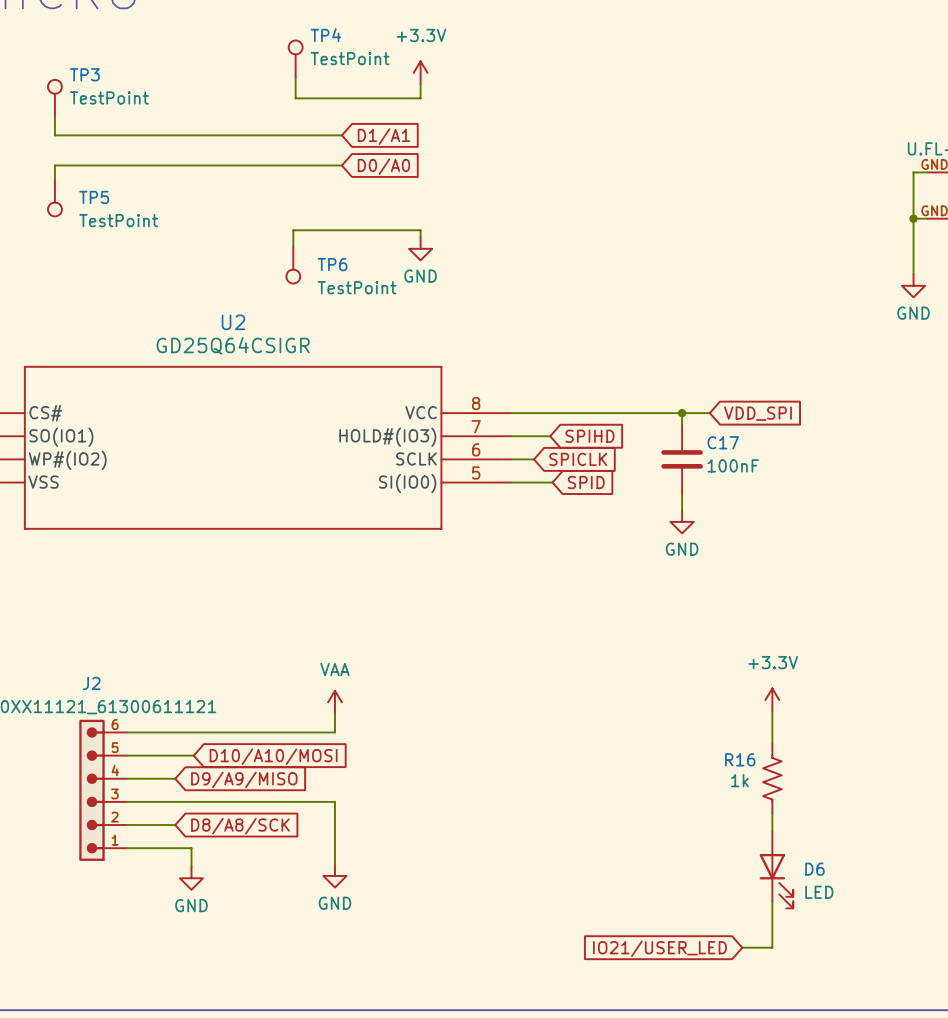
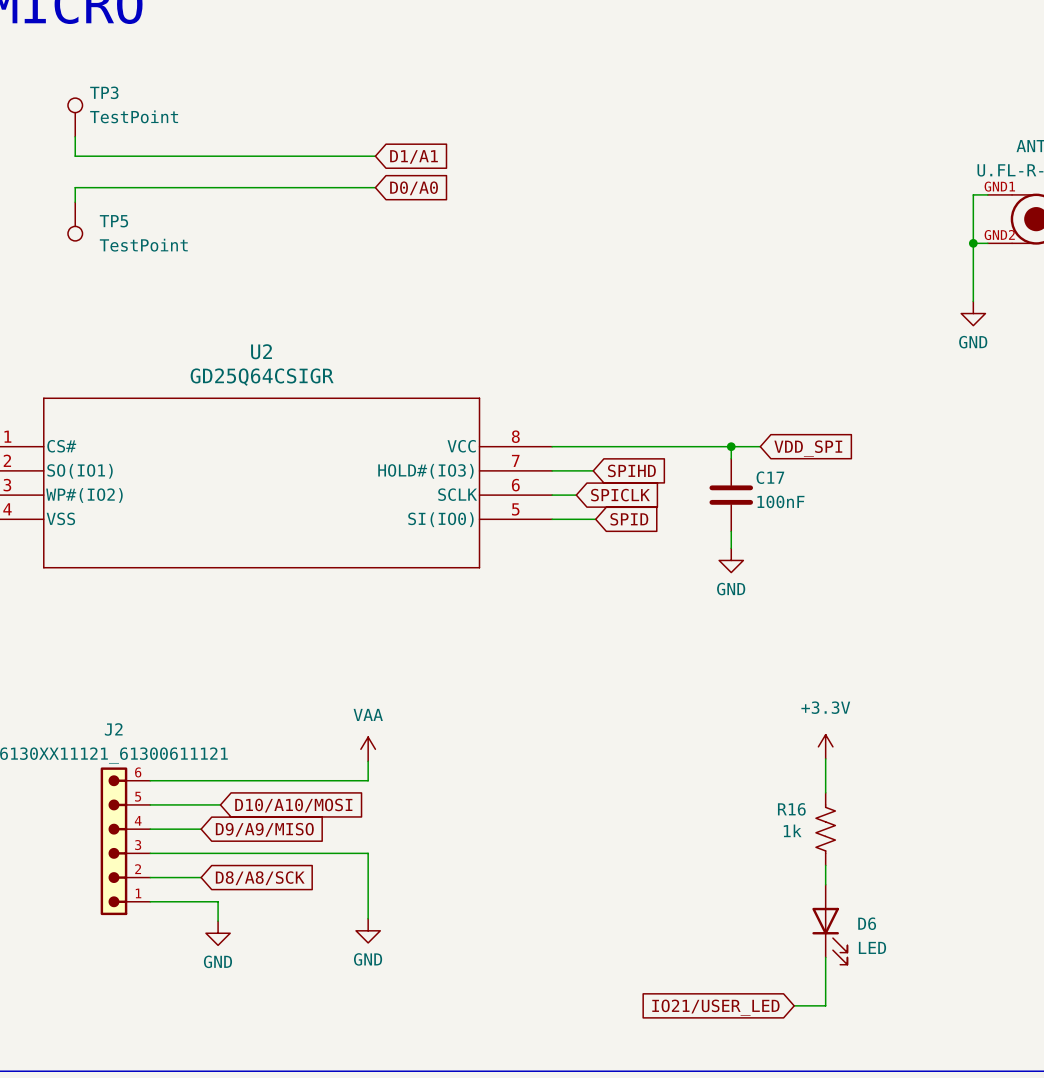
TP4: TestPoint (295, 59) -> none
power symbol: +3.3V (420, 72) -> none
wire: (295, 77) (295, 98) (420, 98) (420, 84) -> none
wire: (420, 237) (420, 230) (293, 230) (293, 246) -> none
power symbol: GND (420, 248) -> none
TP6: TestPoint (293, 264) -> none

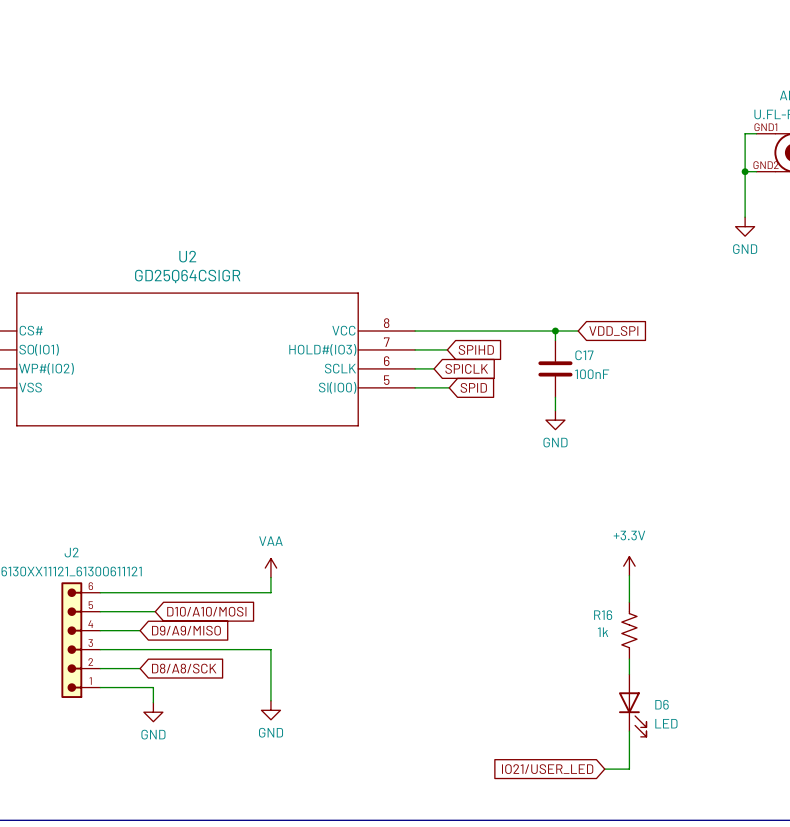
TP3: TestPoint (75, 117) -> none
wire: (75, 136) (75, 156) (375, 156) -> none
global label: D1/A1 (414, 156) -> none
wire: (375, 187) (75, 187) (75, 202) -> none
global label: D0/A0 (414, 188) -> none
TP5: TestPoint (75, 221) -> none

